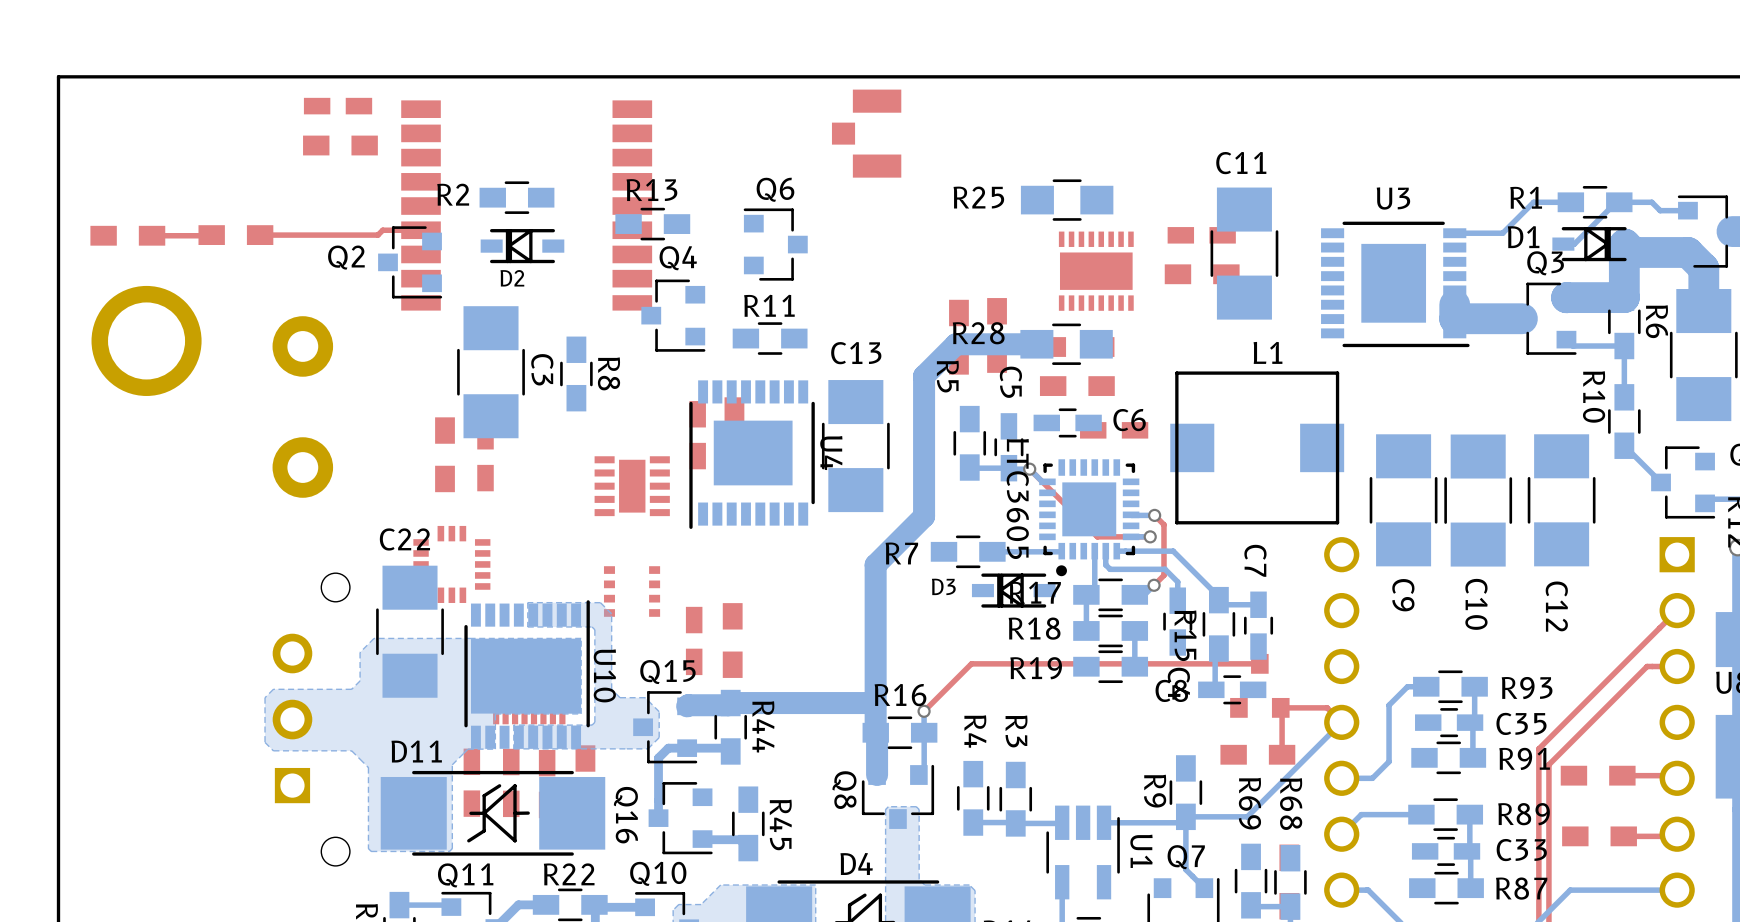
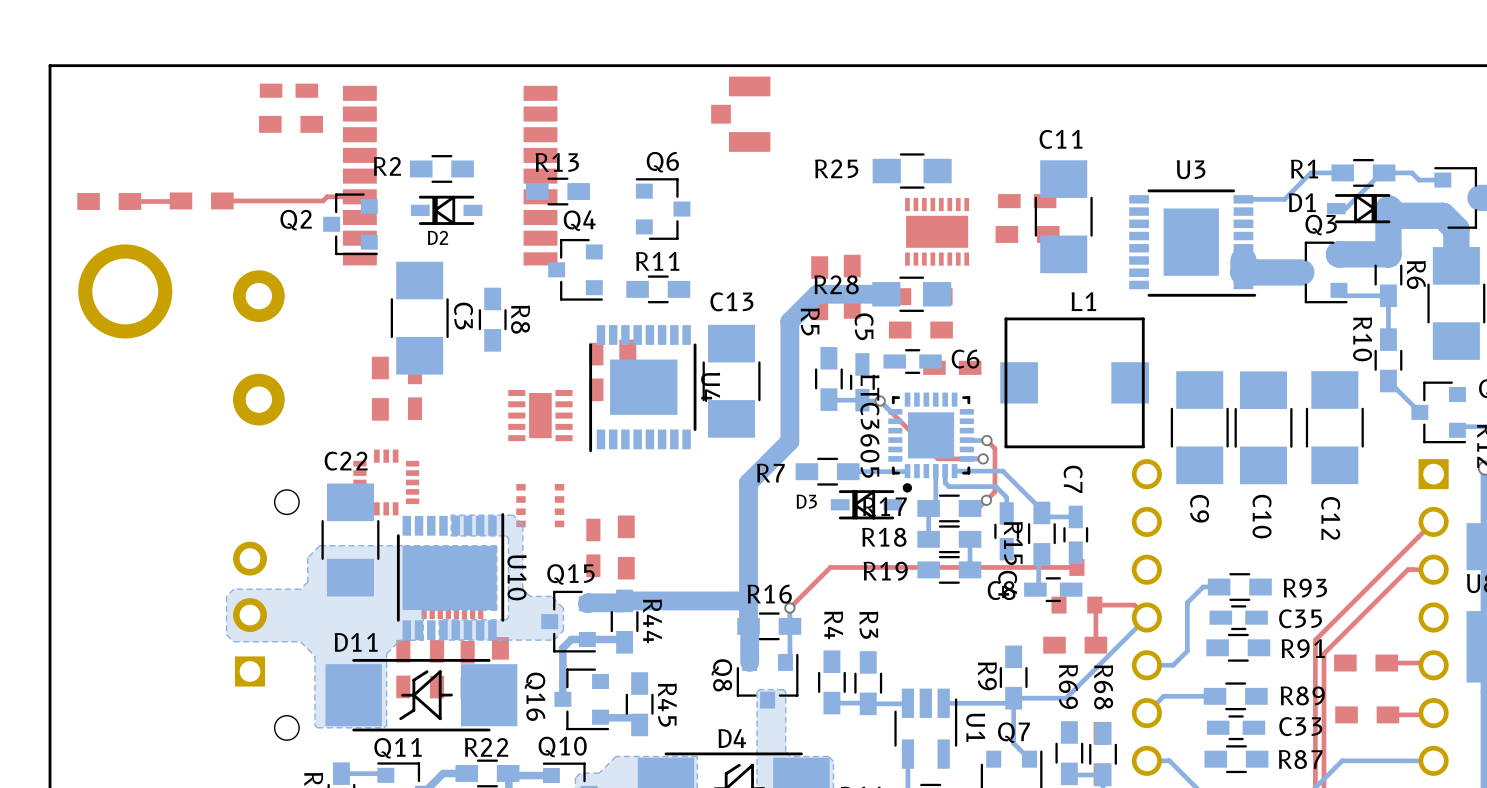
bottom track: (1474, 686) (1474, 718) (1470, 722) (1472, 725) (1472, 757) -> none
bottom track: (1469, 814) (1469, 848) (1466, 851) (1470, 855) (1470, 888) -> none

